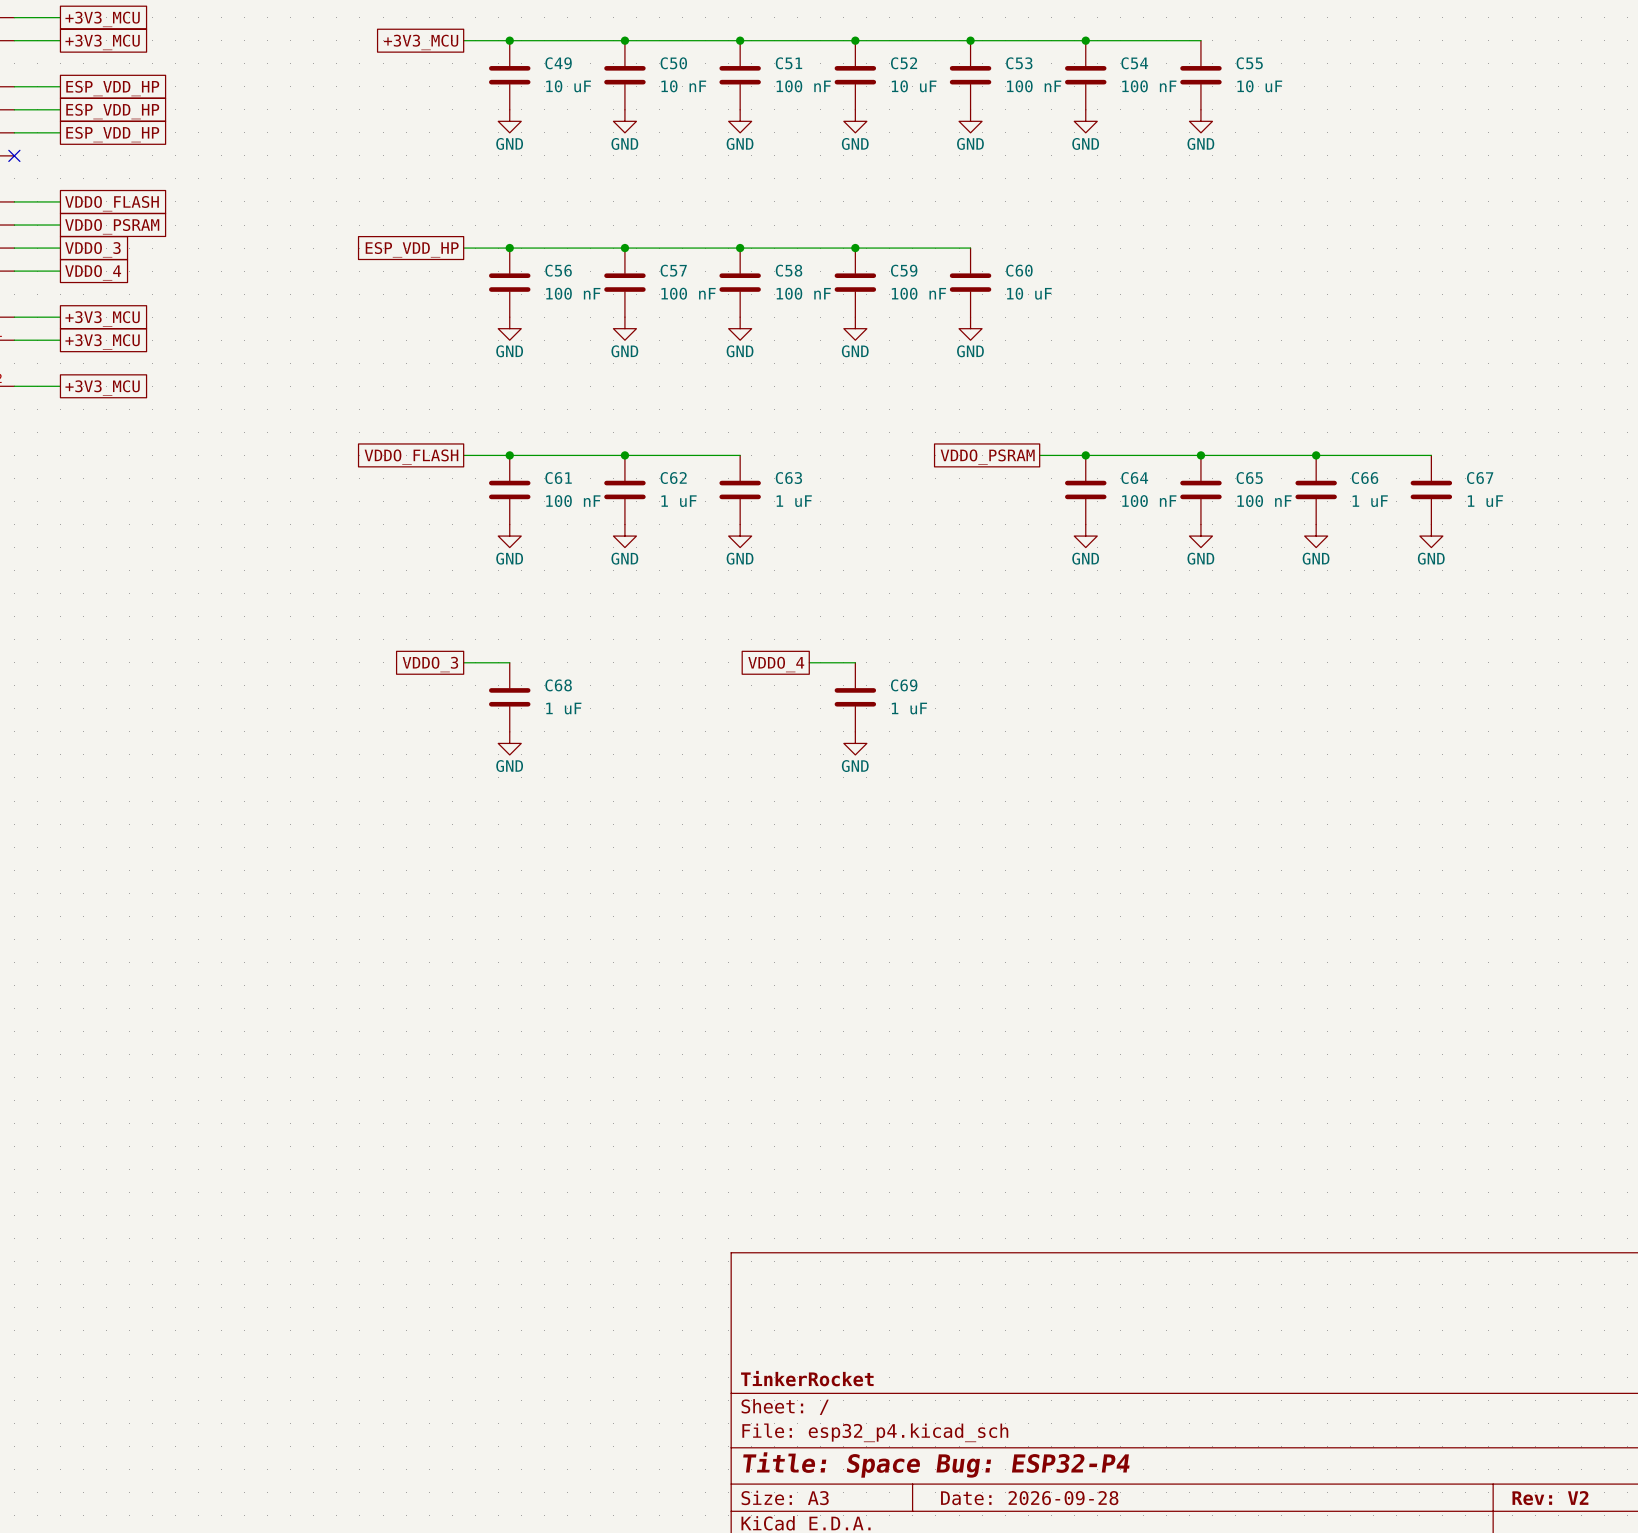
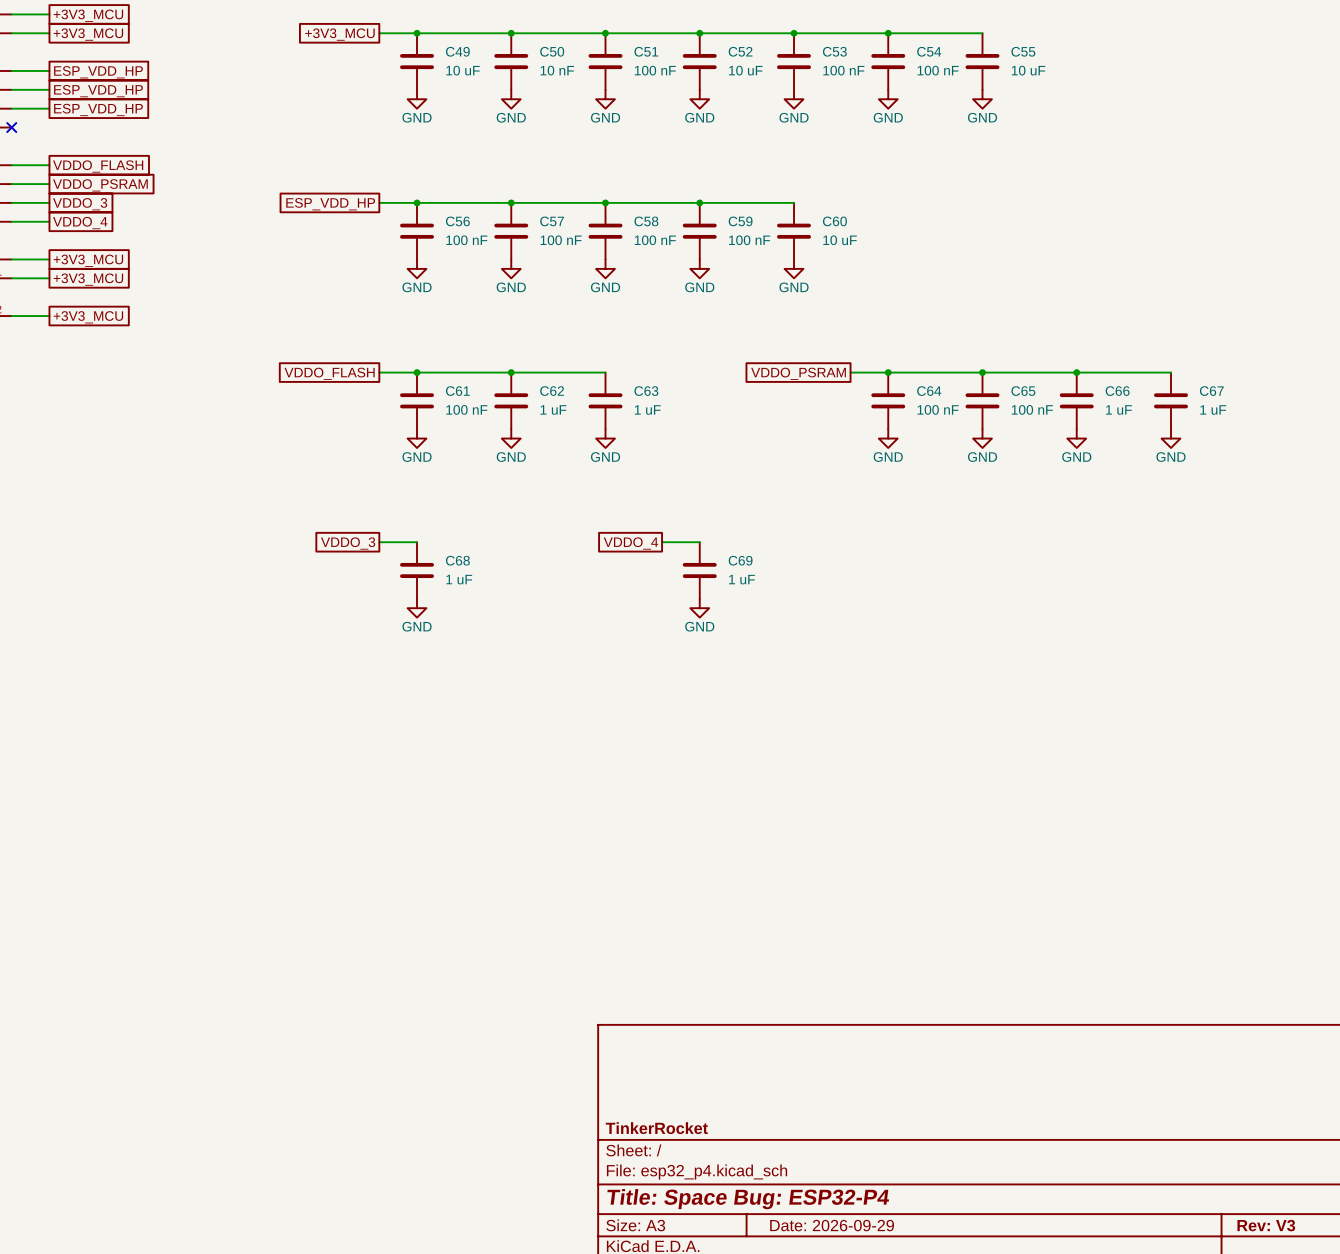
title block: Date: 2026-09-28 (1029, 1498) -> Date: 2026-09-29 (832, 1225)
title block: Rev: V2 (1550, 1498) -> Rev: V3 (1266, 1225)

